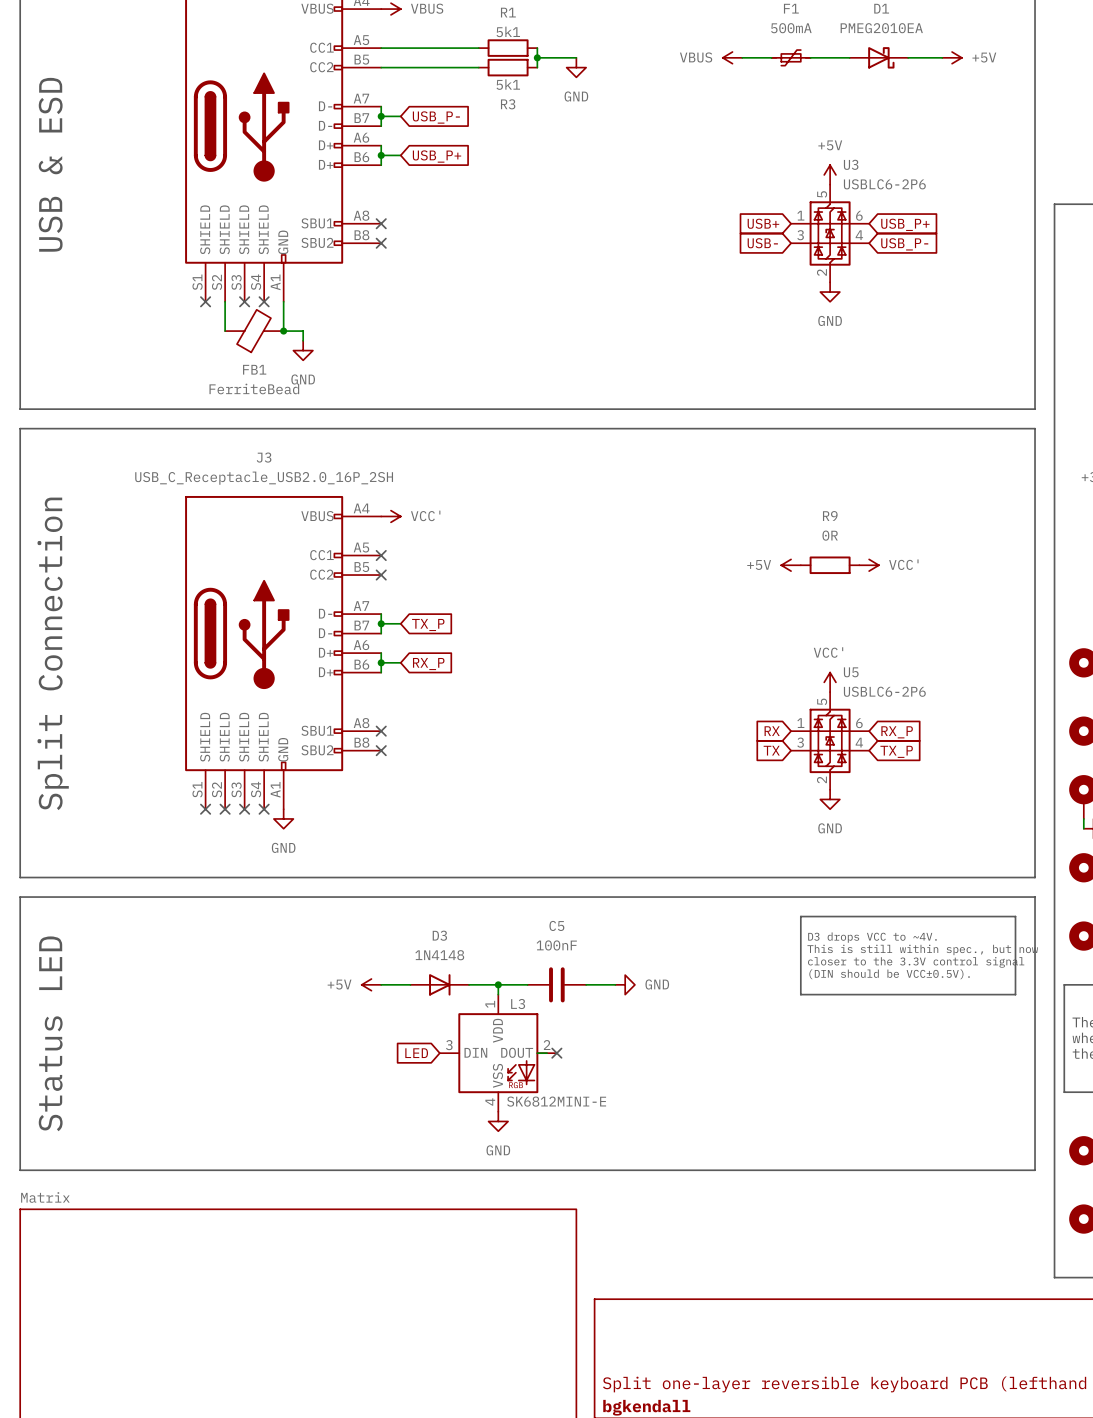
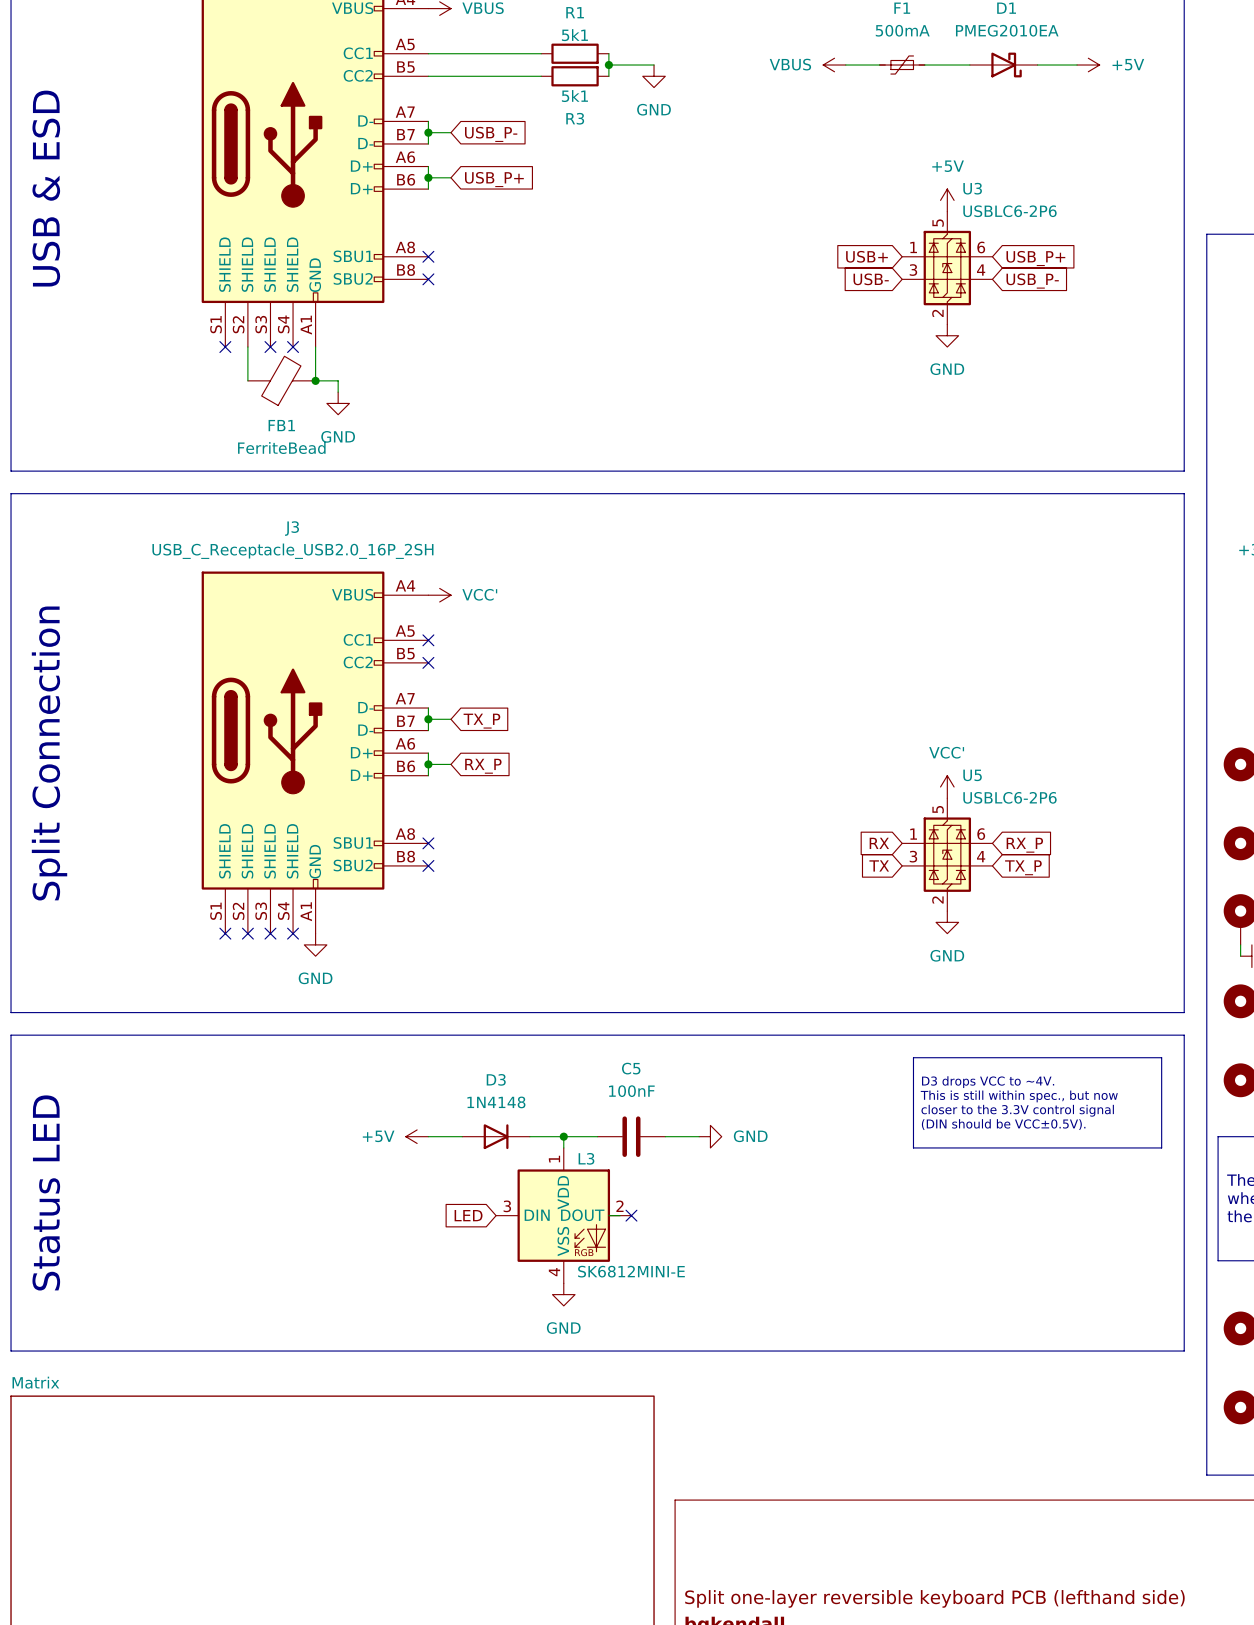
power symbol: +5V (791, 565) -> none
R9: 0R (830, 565) -> none
power symbol: VCC' (869, 565) -> none

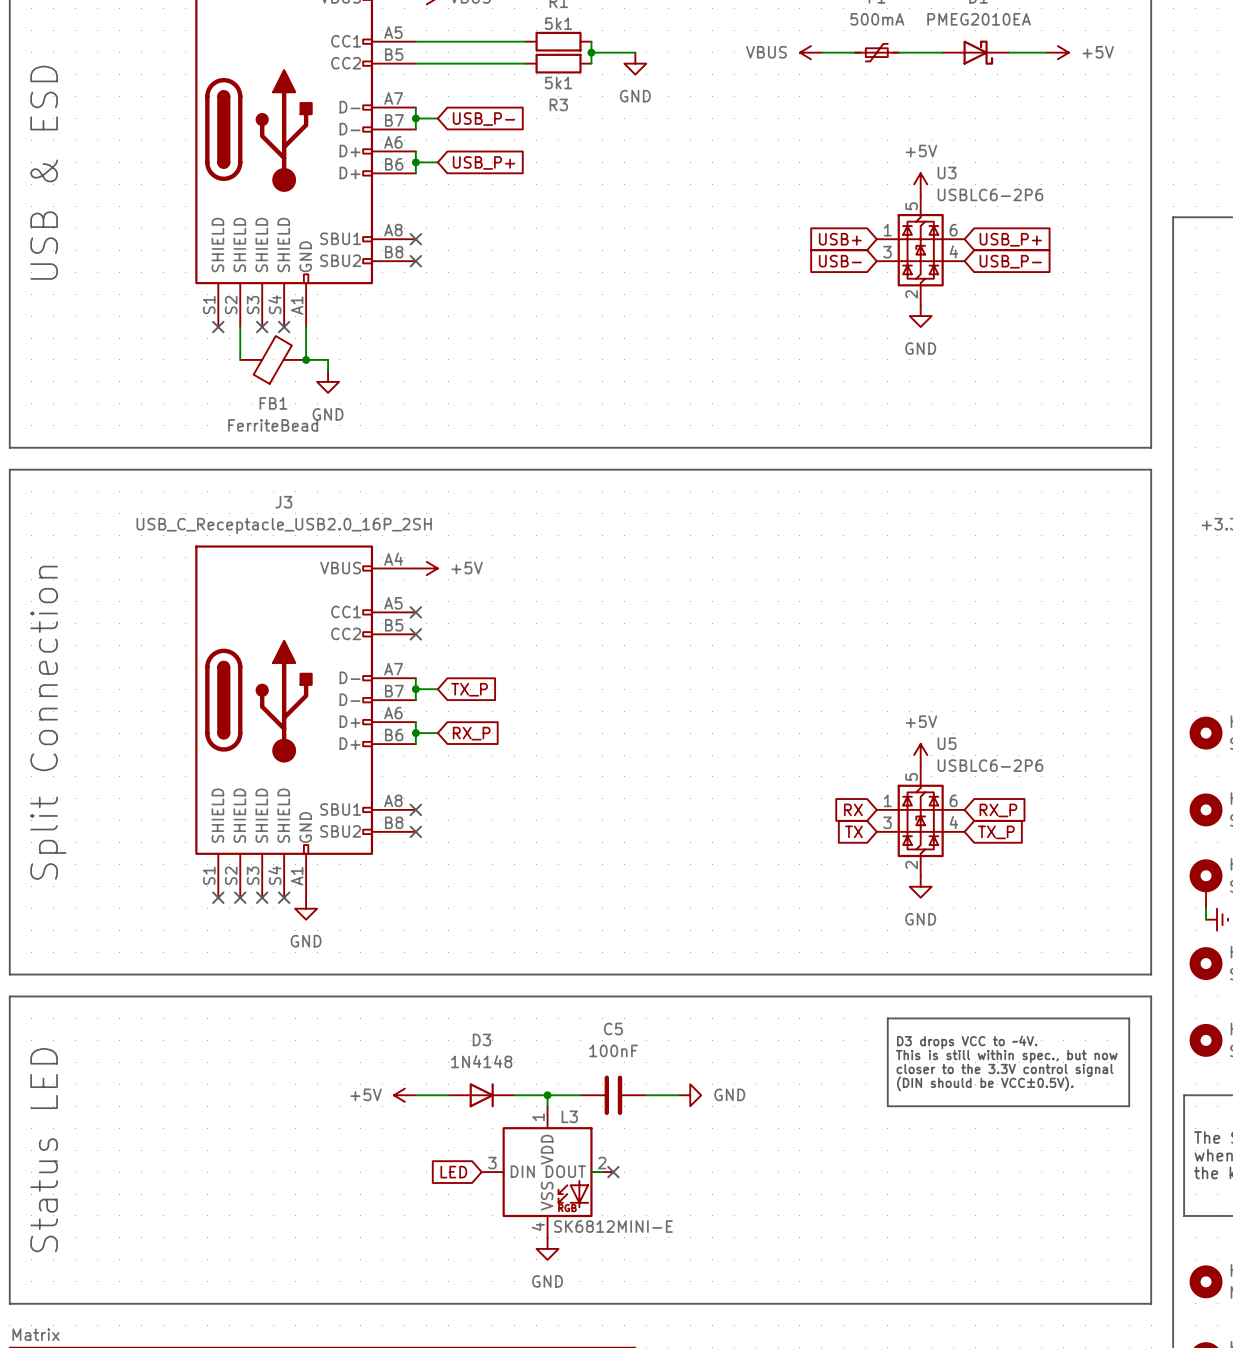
power symbol: VCC' (439, 595) -> +5V (426, 568)
power symbol: VCC' (947, 786) -> +5V (920, 755)

